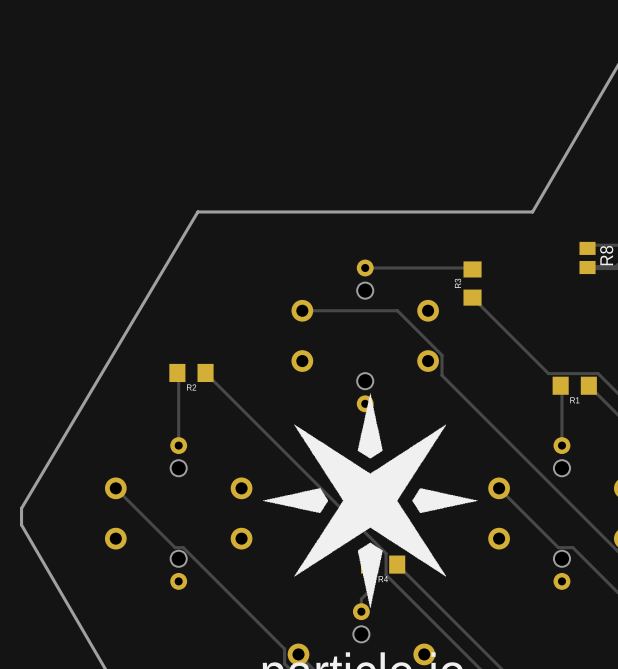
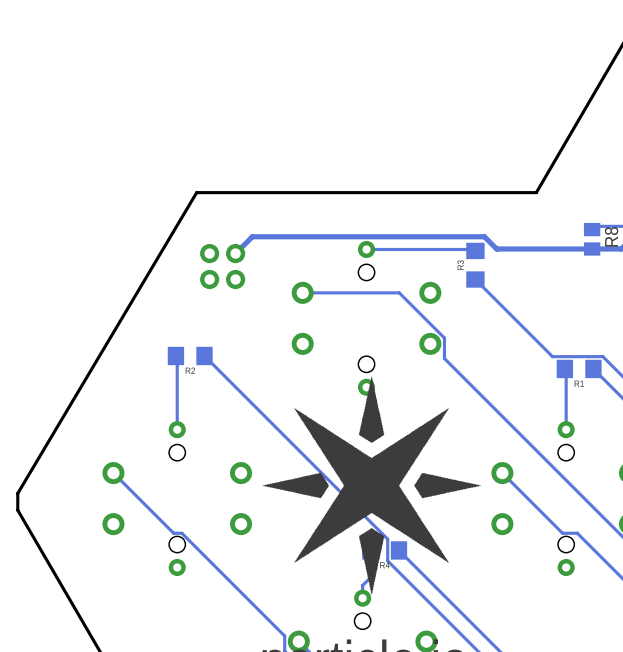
track: none -> (592, 249) (496, 249) (484, 236) (252, 236) (235, 253)
part: none -> (209, 266)
part: none -> (235, 266)

